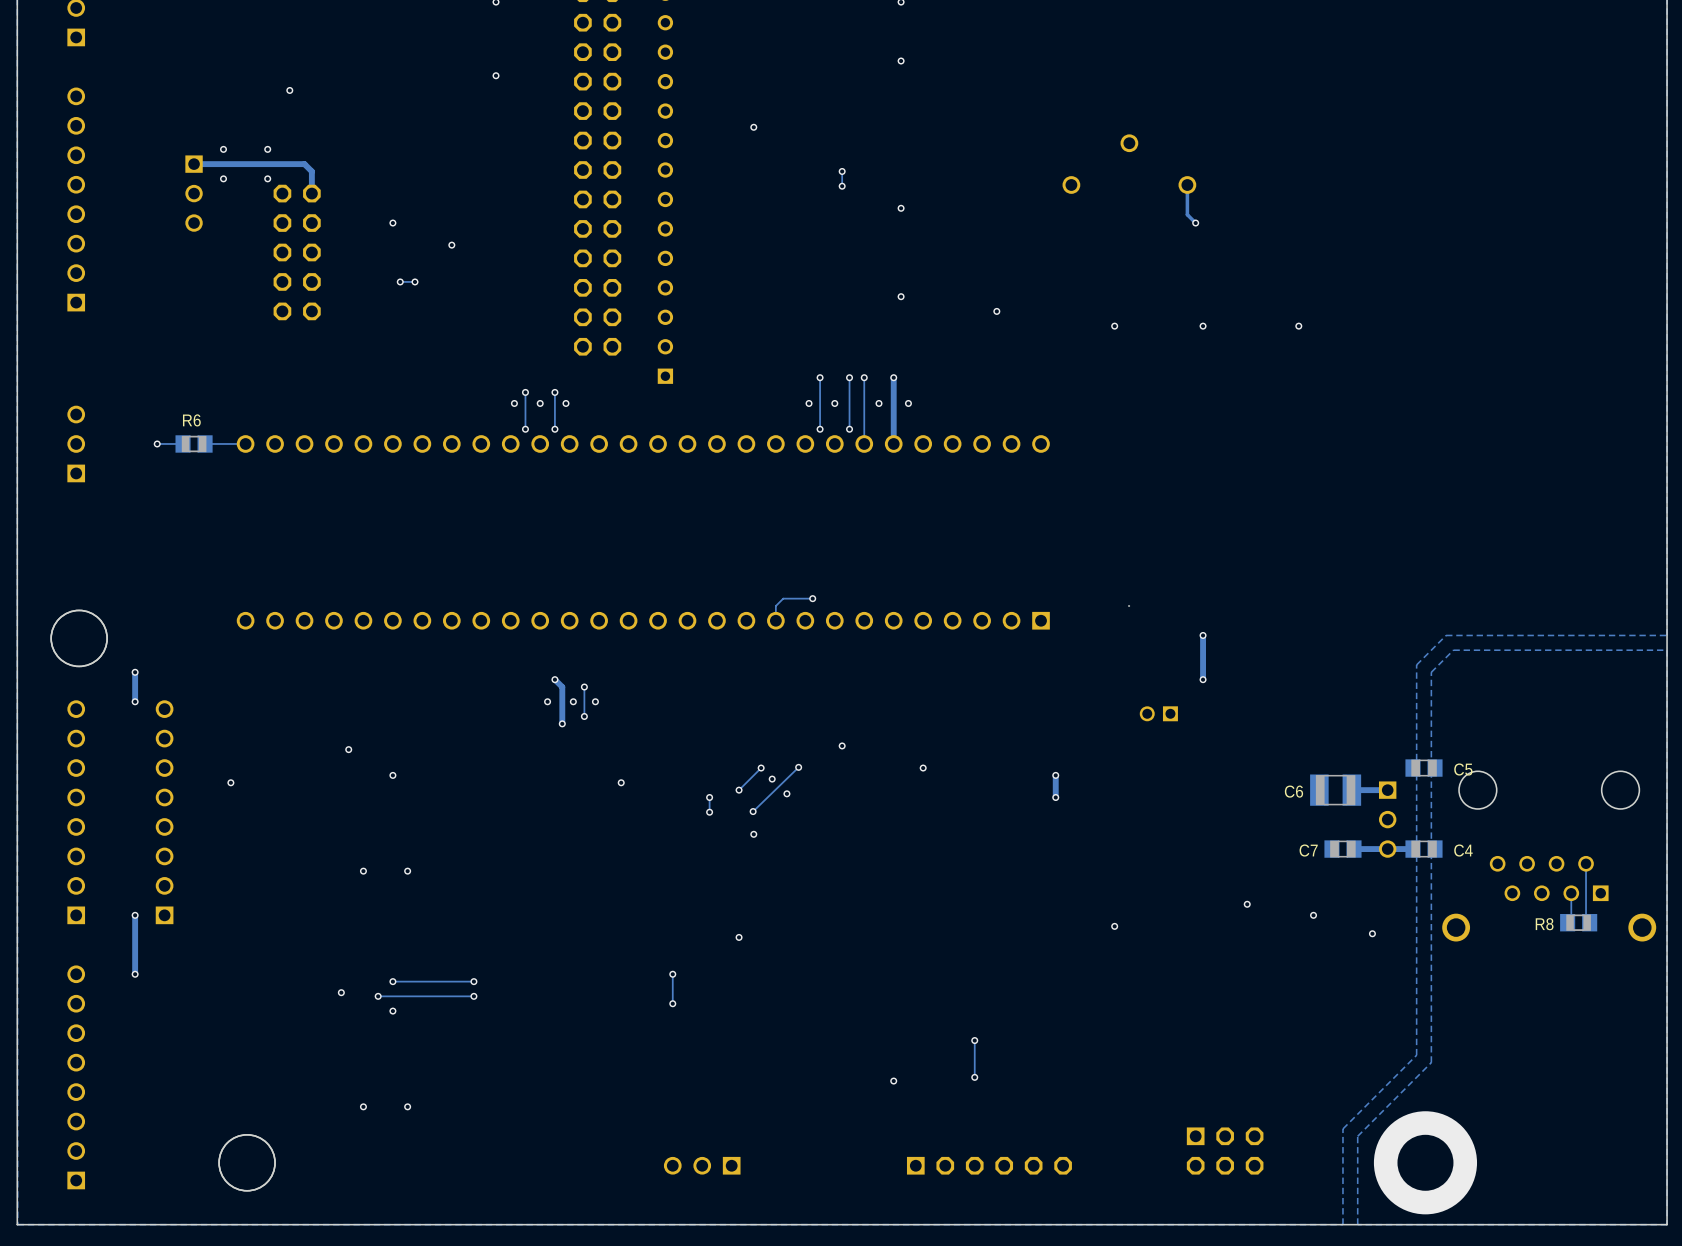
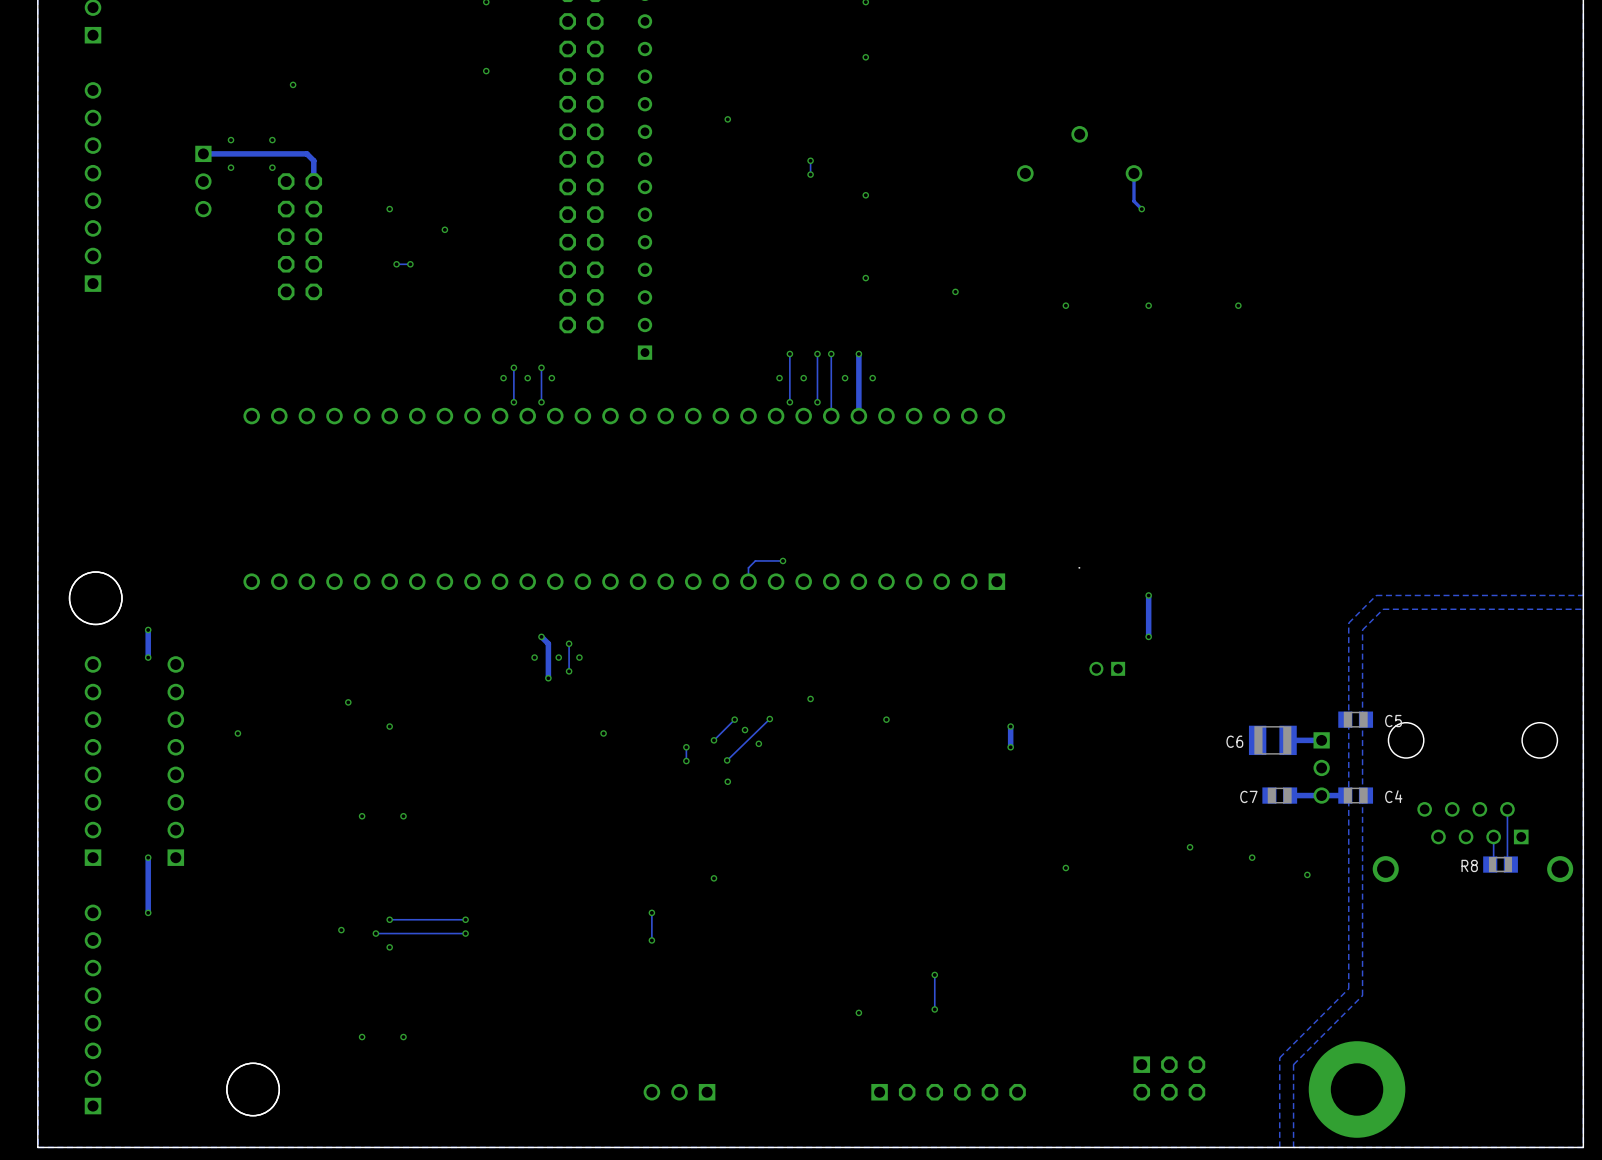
part: (76, 443) -> none
via: (157, 443) -> none
track: (183, 443) (157, 443) -> none
R6: (194, 443) -> none
track: (245, 443) (205, 443) -> none

